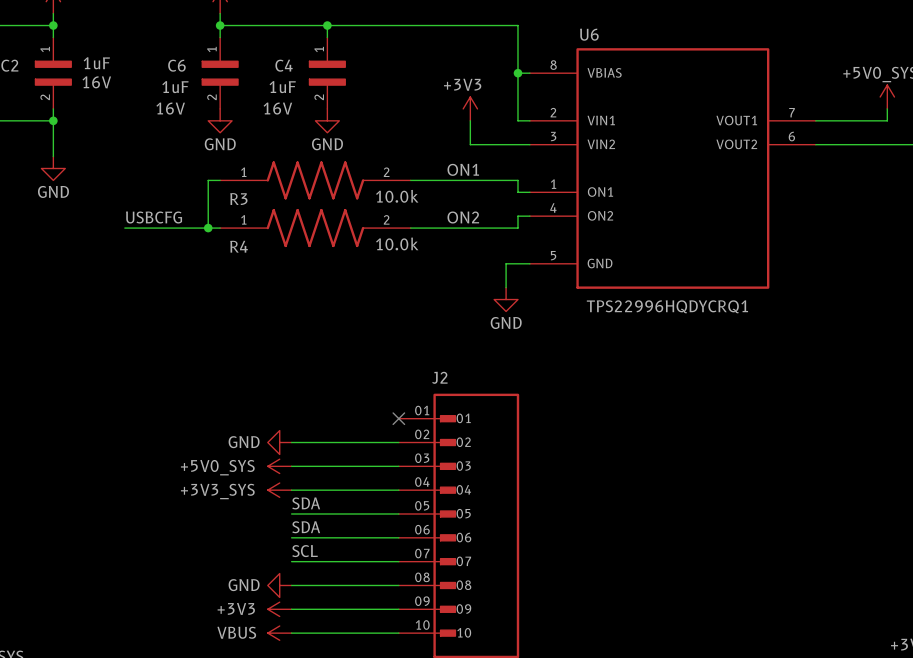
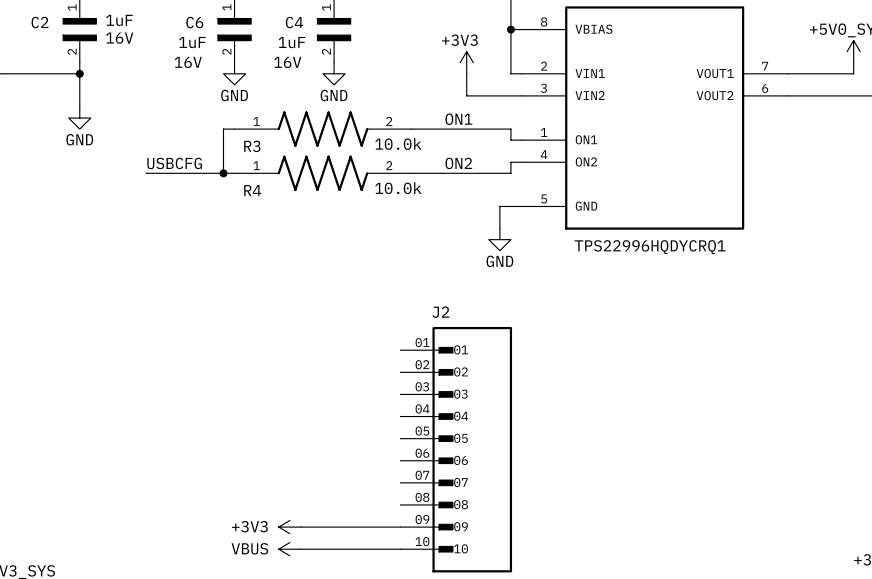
no-connect mark: (398, 418) -> none
power symbol: GND (279, 442) -> none
wire: (291, 442) (398, 442) -> none
power symbol: +5V0_SYS (279, 466) -> none
wire: (291, 466) (398, 466) -> none
power symbol: +3V3_SYS (279, 490) -> none
wire: (291, 490) (398, 490) -> none
label: SDA (306, 503) -> none
wire: (291, 514) (398, 514) -> none
label: SDA (306, 527) -> none
wire: (291, 537) (398, 537) -> none
label: SCL (305, 551) -> none
wire: (291, 561) (398, 561) -> none
power symbol: GND (279, 585) -> none
wire: (291, 585) (398, 585) -> none

